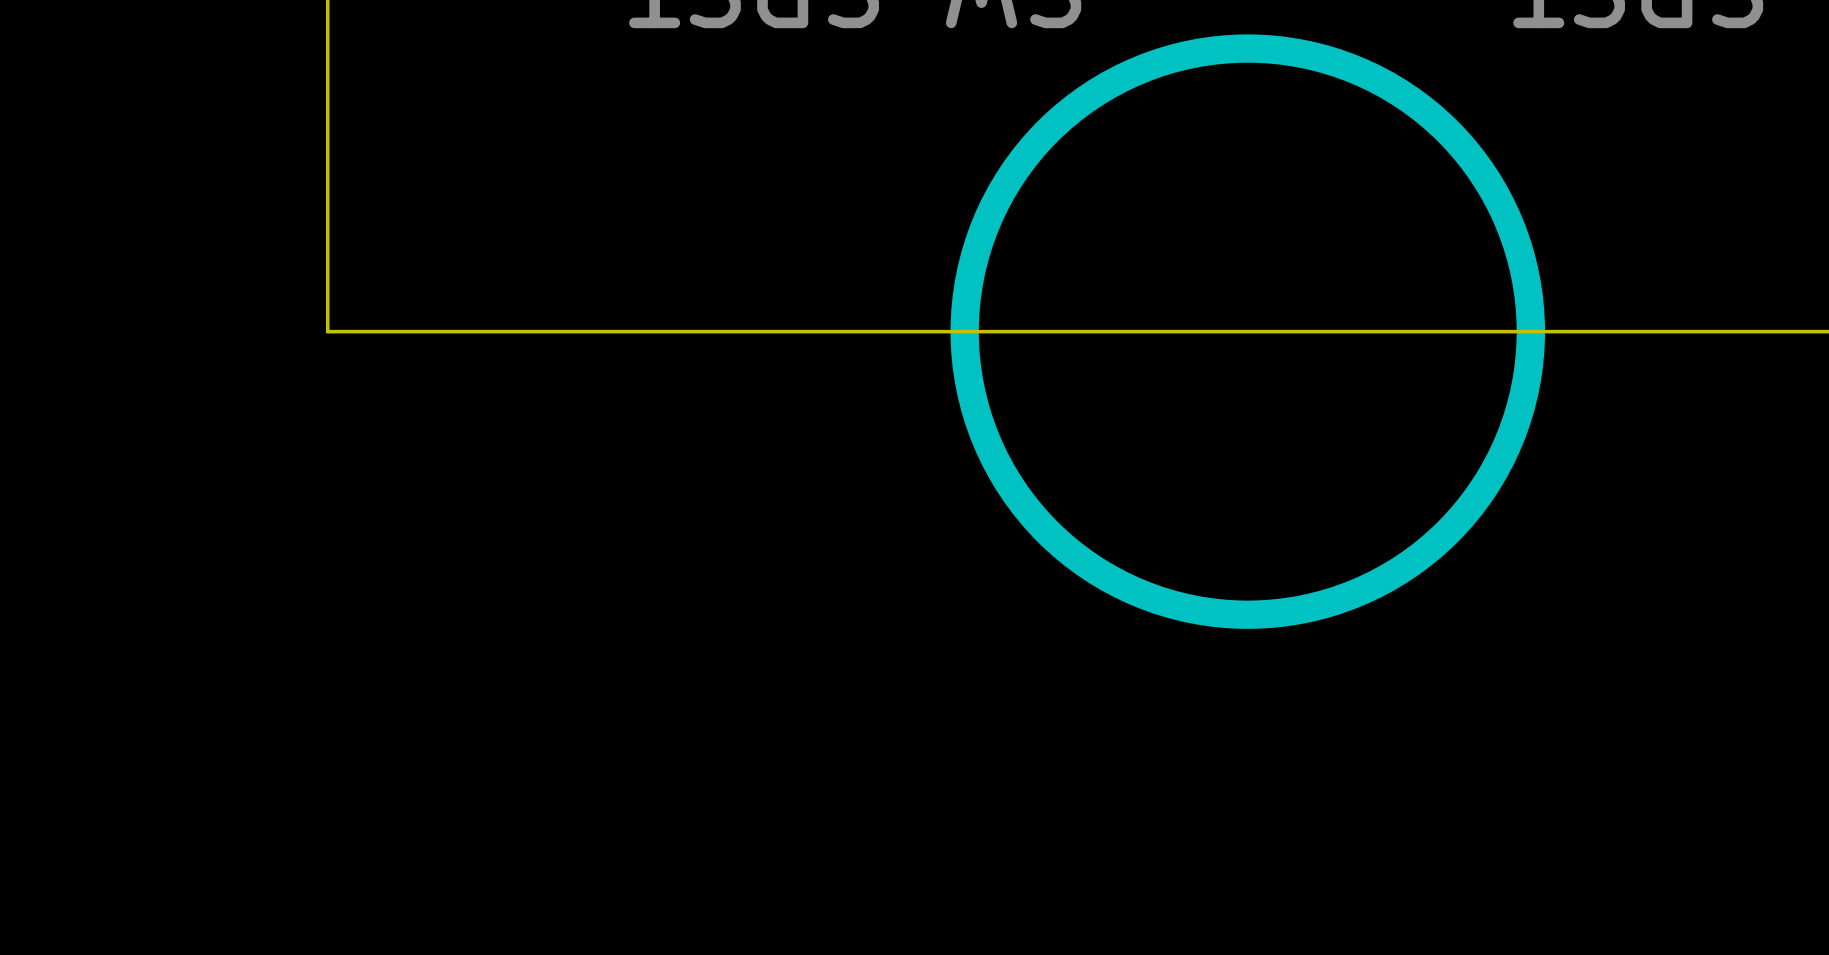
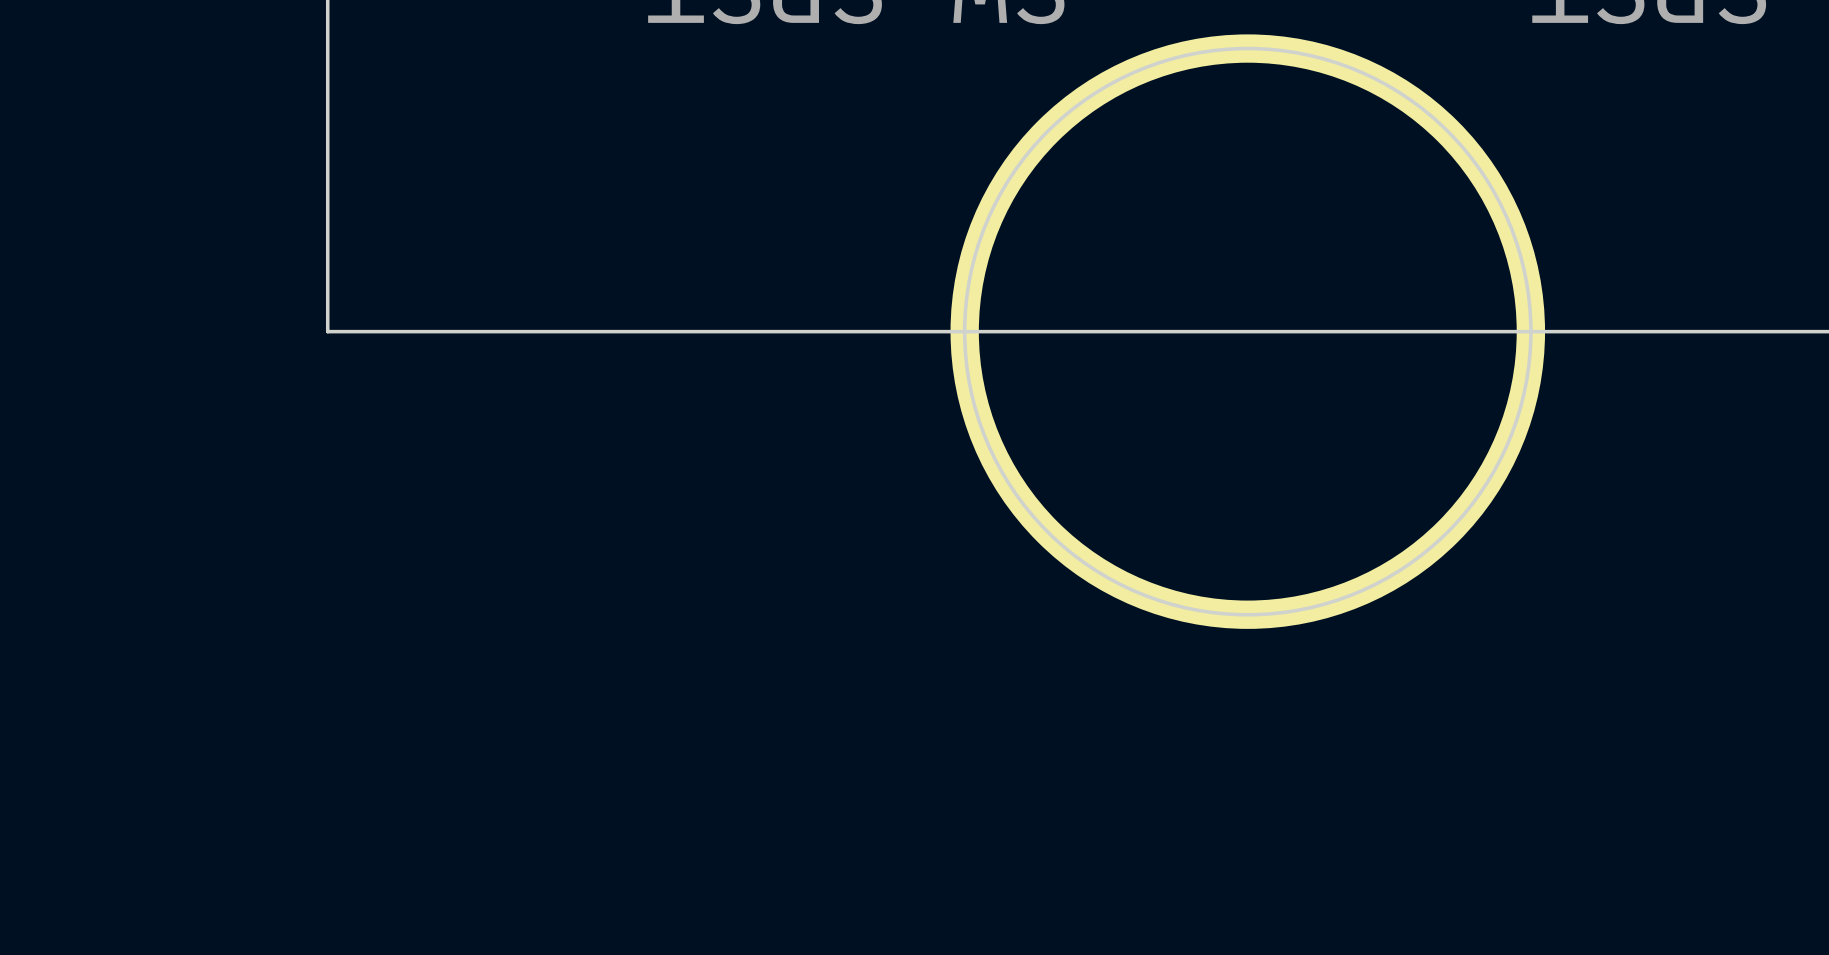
round board edge: none -> [962, 46, 1533, 617]

